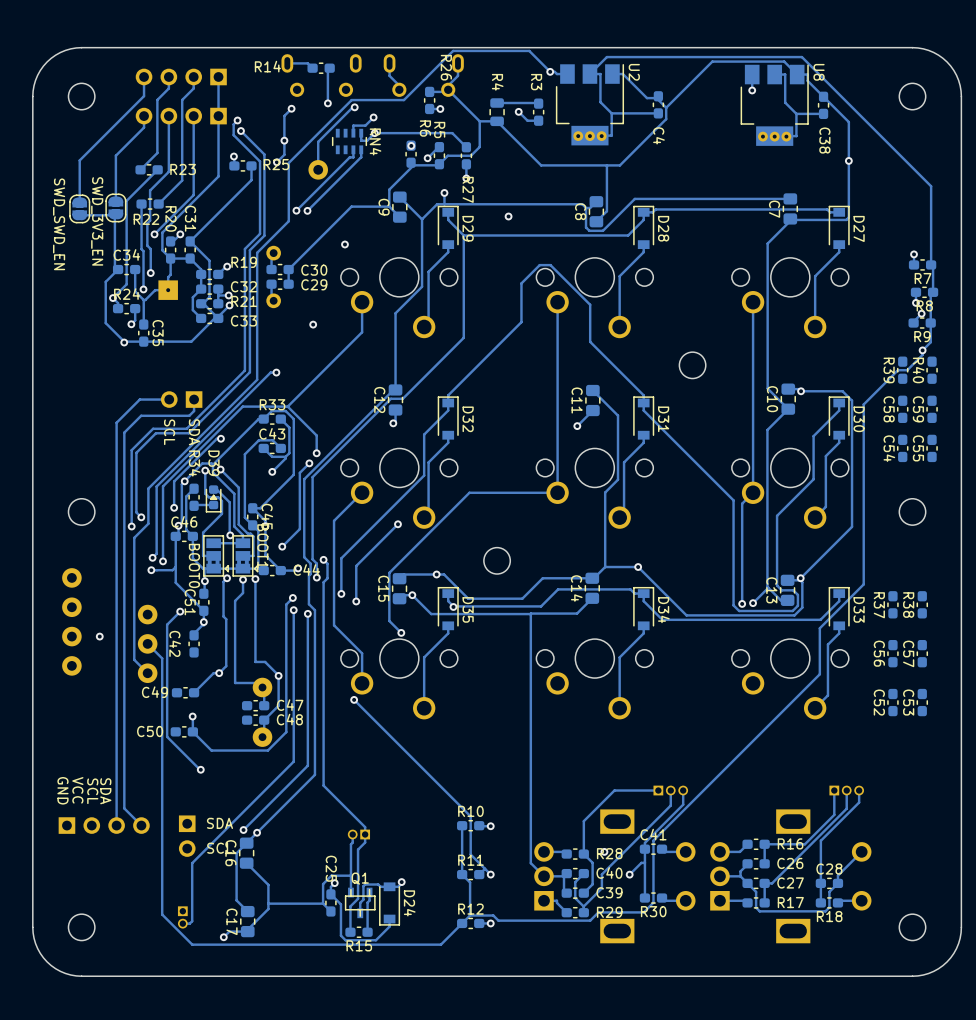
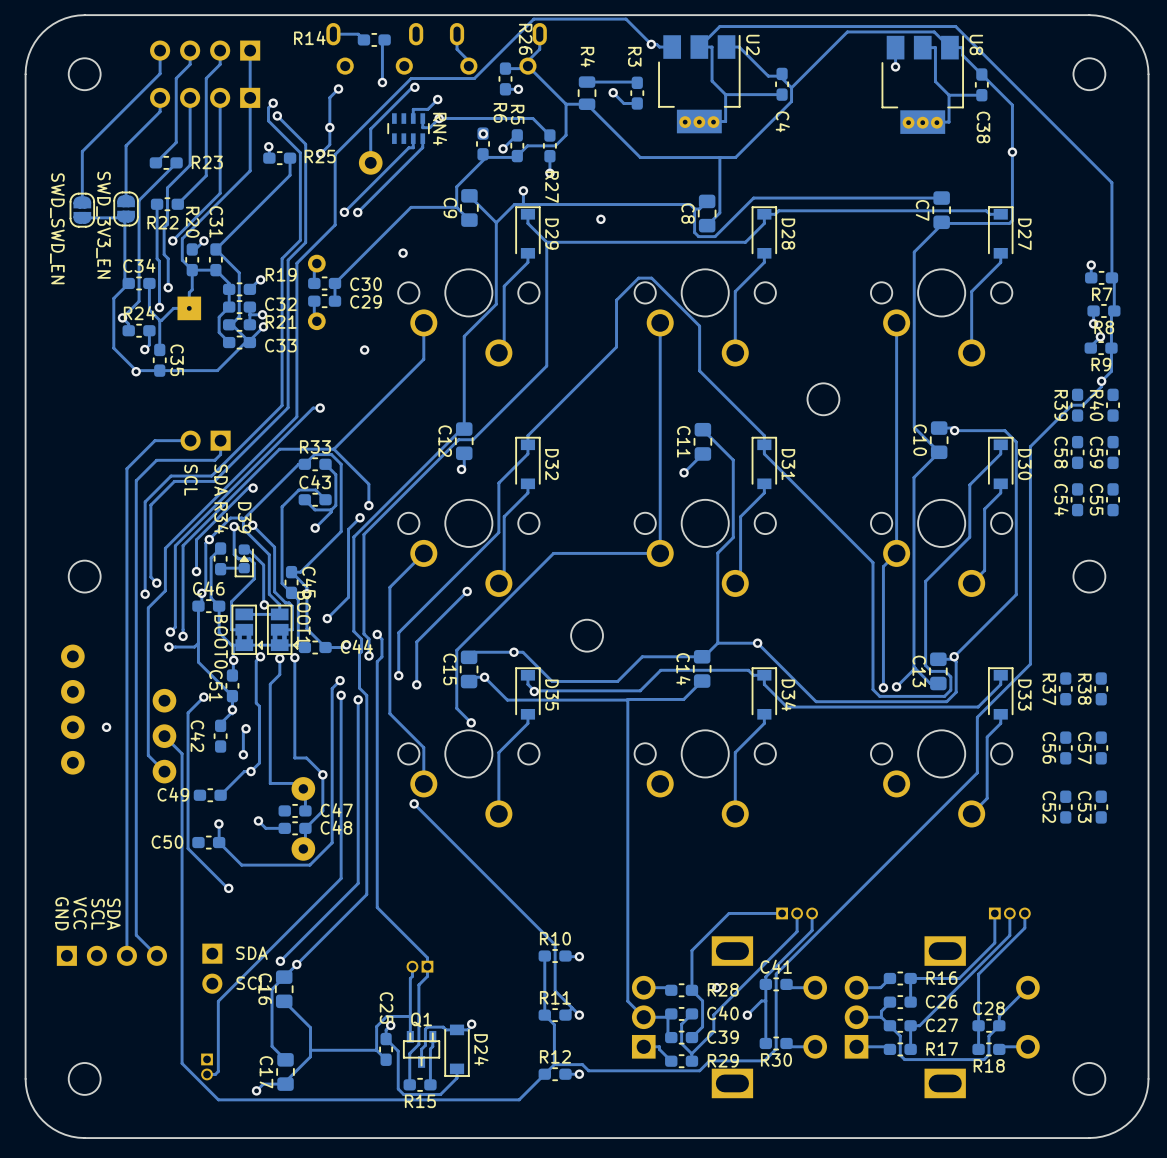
track: none -> (246, 728) (243, 731) (243, 754)
via: none -> (246, 728)
via: none -> (243, 754)
track: none -> (258, 820) (265, 828) (284, 828)
via: none -> (258, 820)

